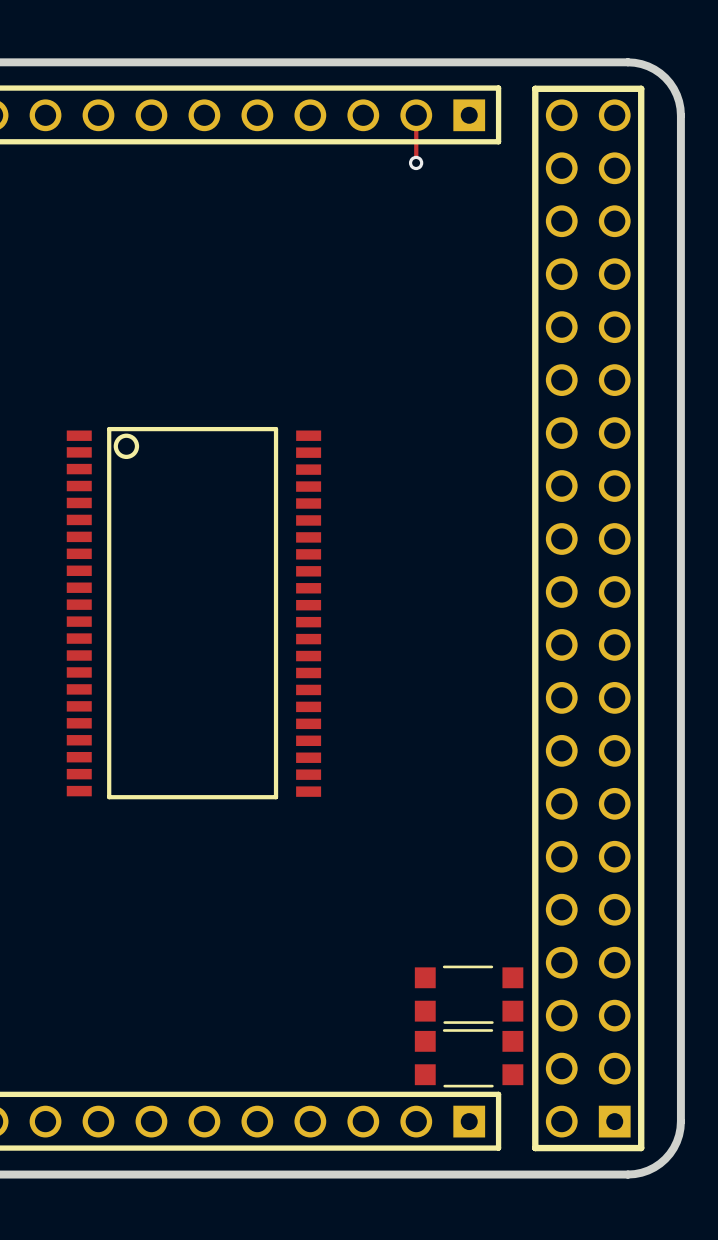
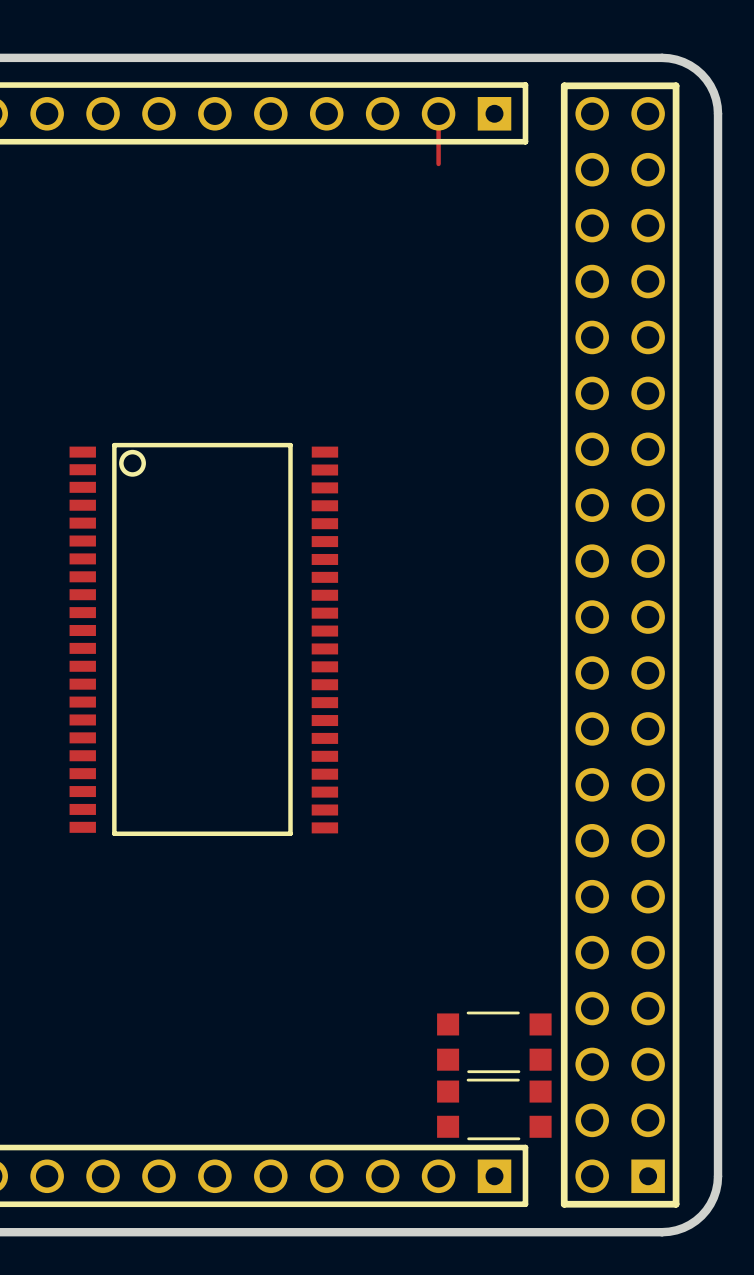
via: (416, 162) -> none

